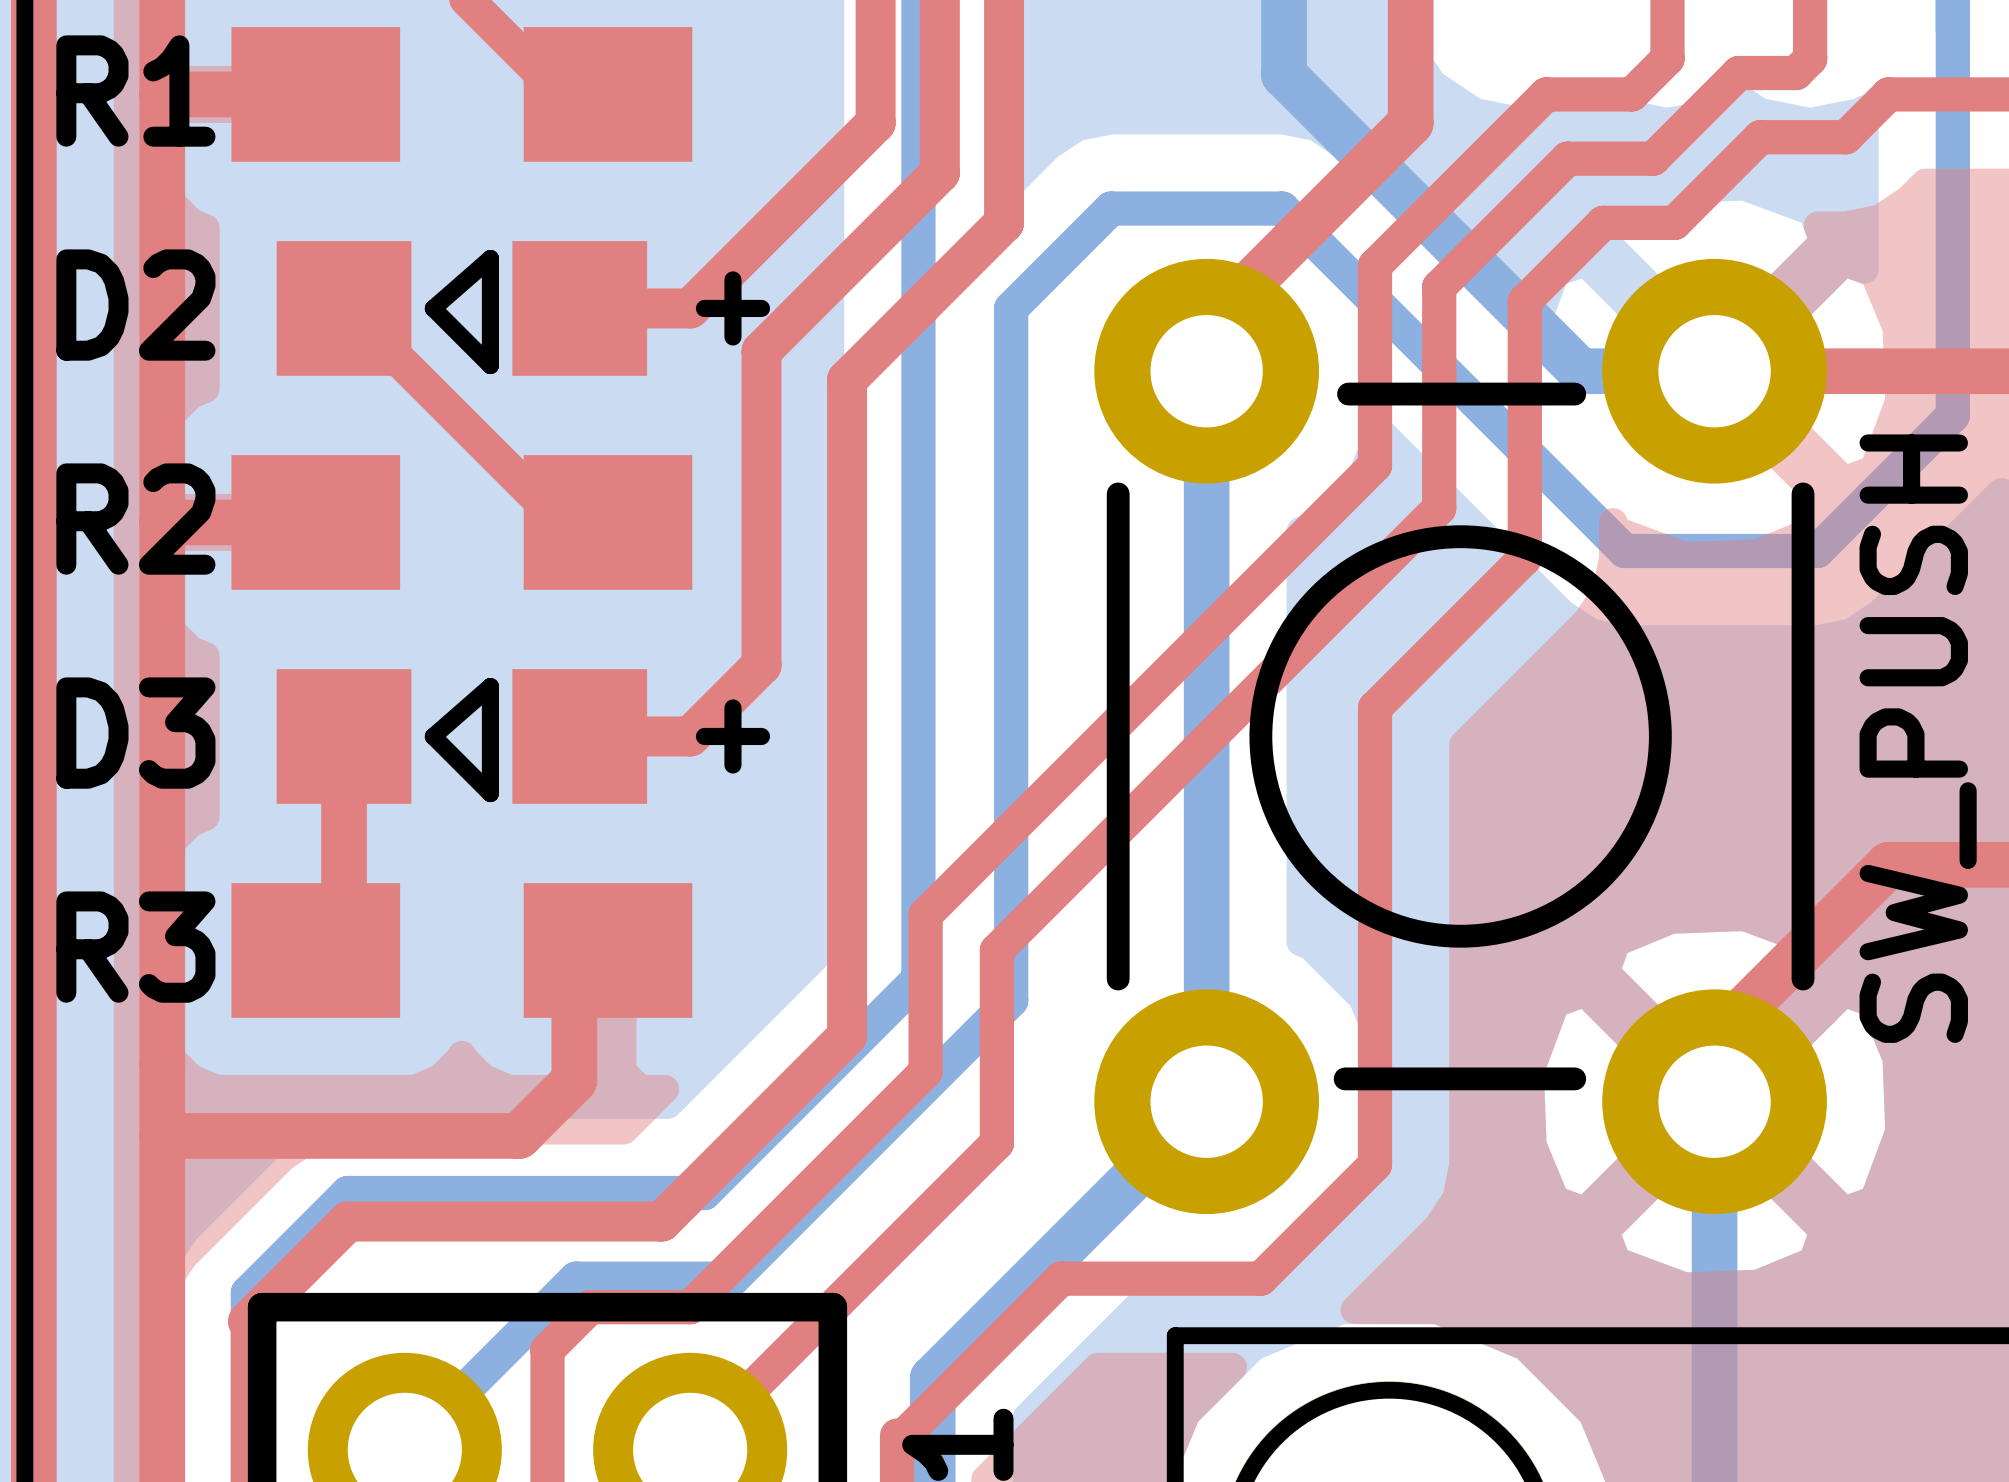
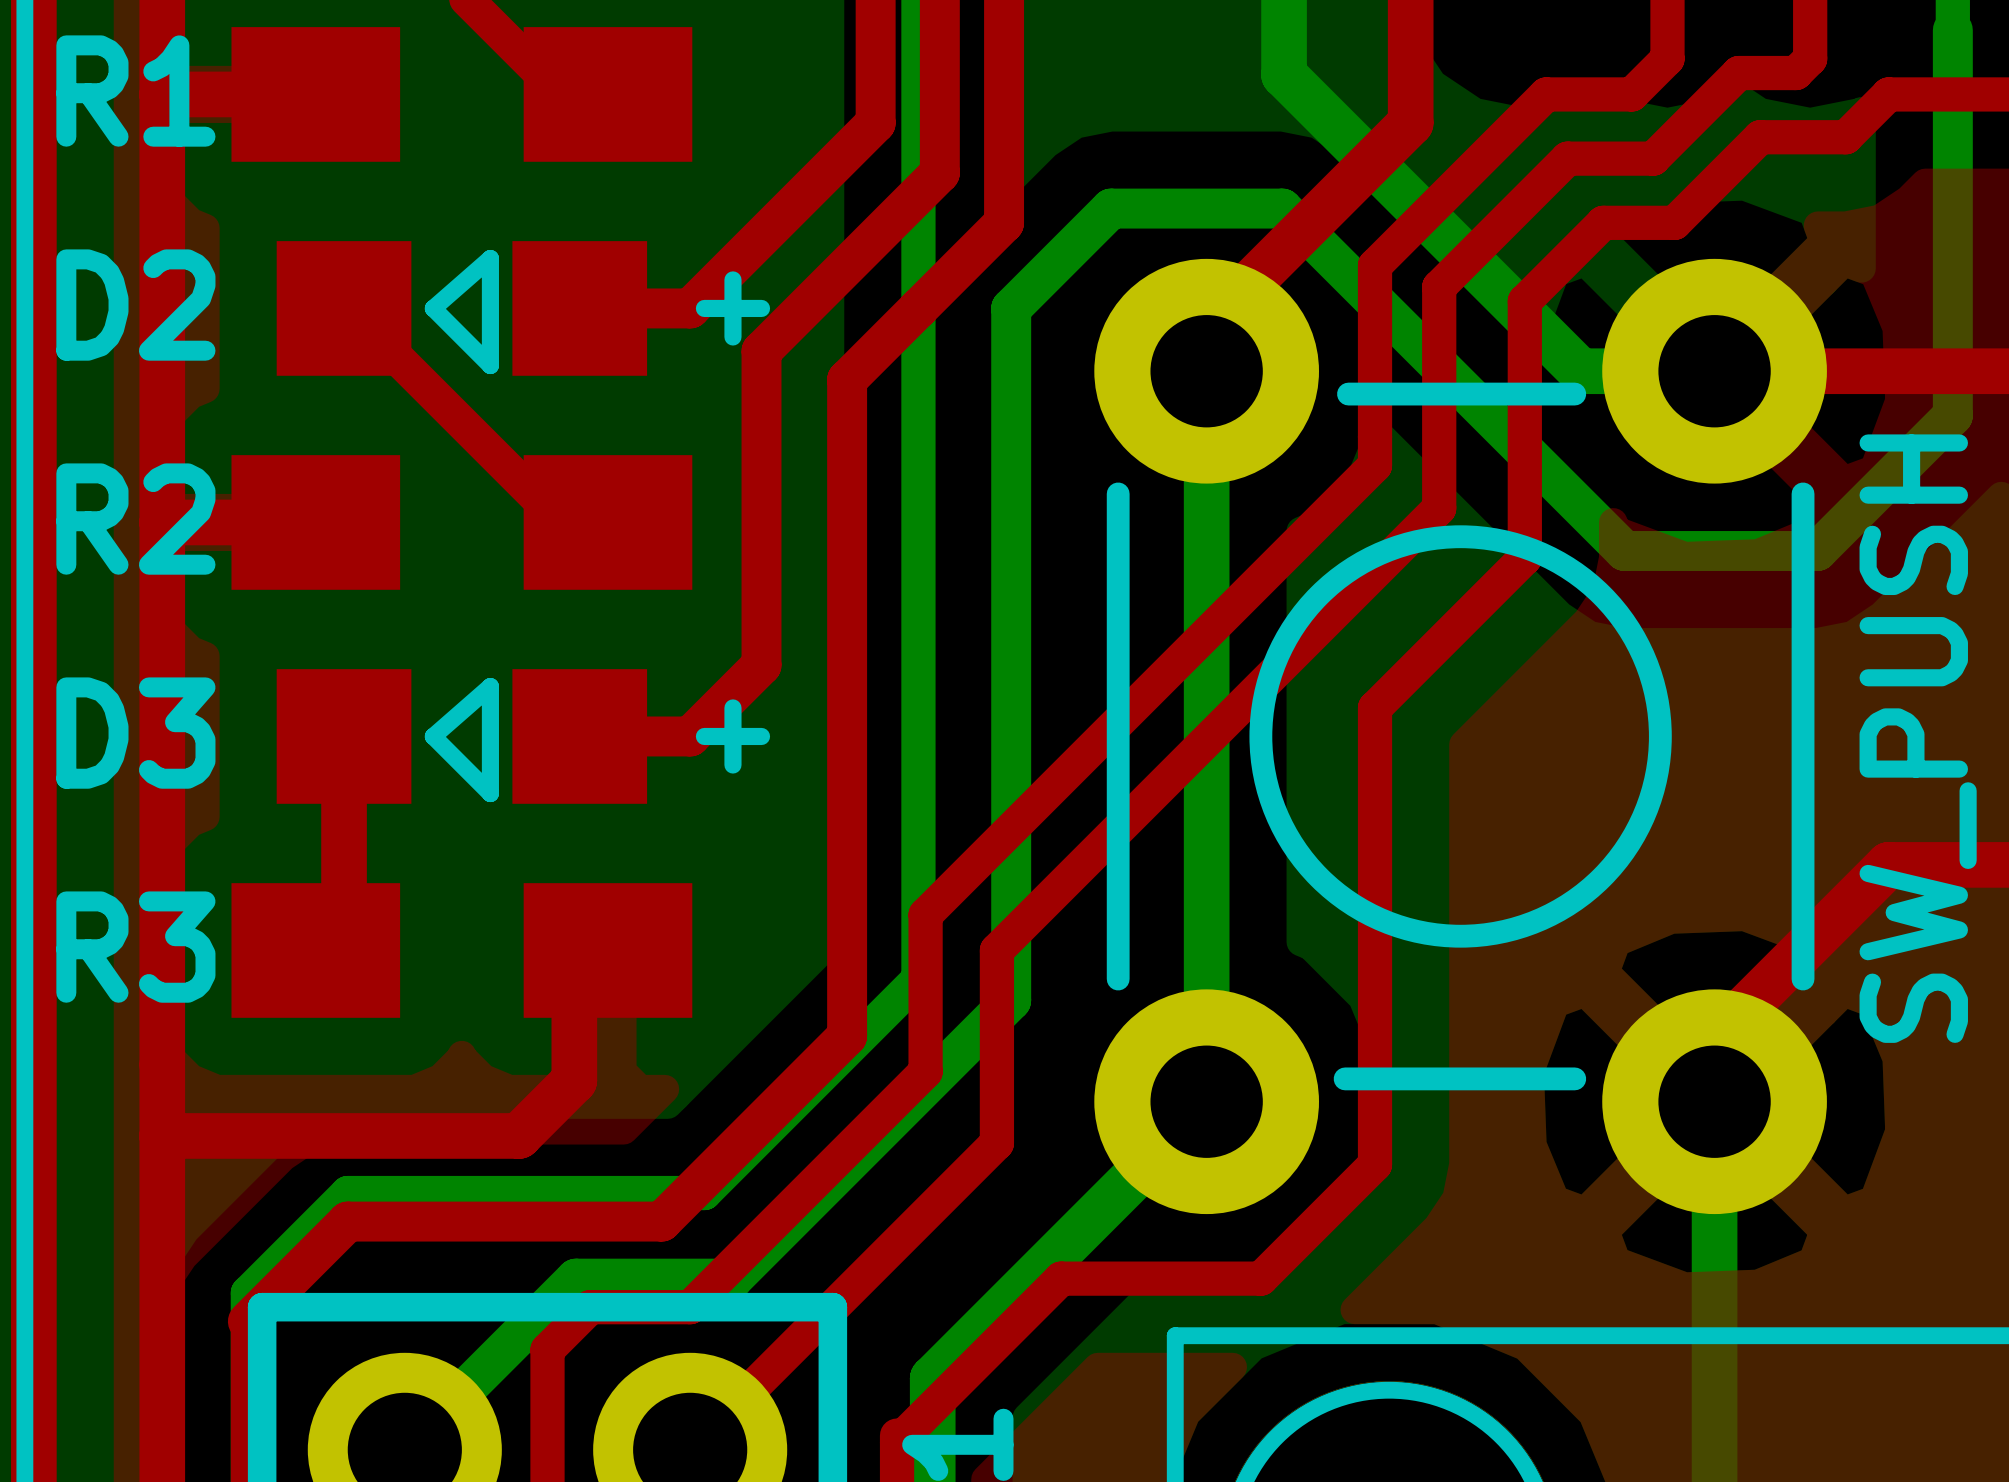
bottom track width: thin (1952, 30) (1952, 415) (1817, 551) (1624, 551) (1282, 208) (1111, 208) (1011, 308) (1011, 1000) (732, 1278) (576, 1278) (404, 1449) -> thick (1952, 30) (1952, 415) (1817, 551) (1624, 551) (1282, 208) (1111, 208) (1011, 308) (1011, 1000) (732, 1278) (576, 1278) (404, 1449)

